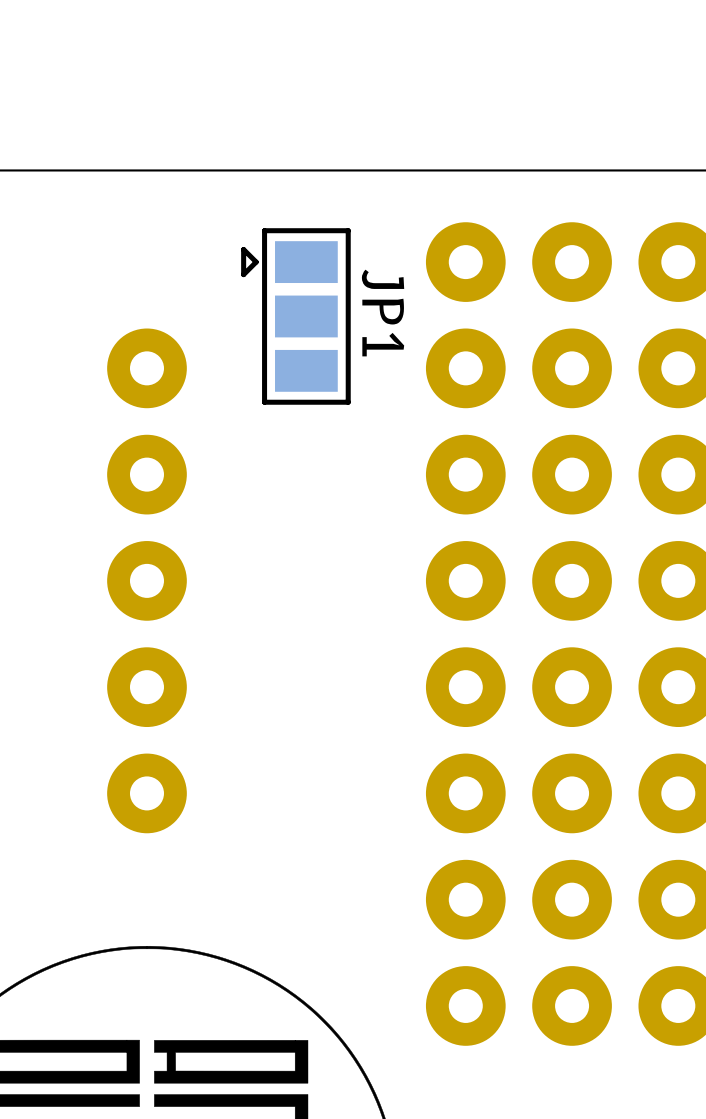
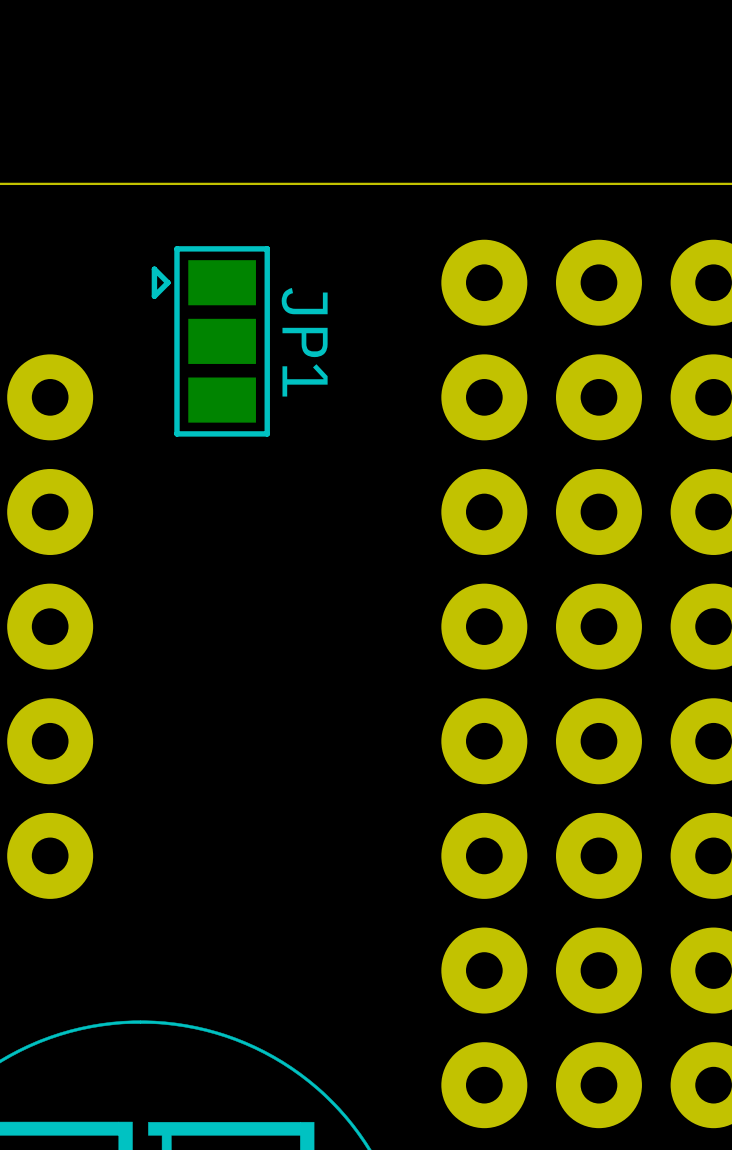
JP1 position: (295, 316) -> (210, 341)
part: none -> (50, 397)
part: (146, 368) -> none
part: none -> (50, 511)
part: (146, 474) -> none
part: none -> (50, 626)
part: (146, 580) -> none
part: none -> (50, 741)
part: (146, 687) -> none
part: none -> (50, 855)
part: (146, 793) -> none

